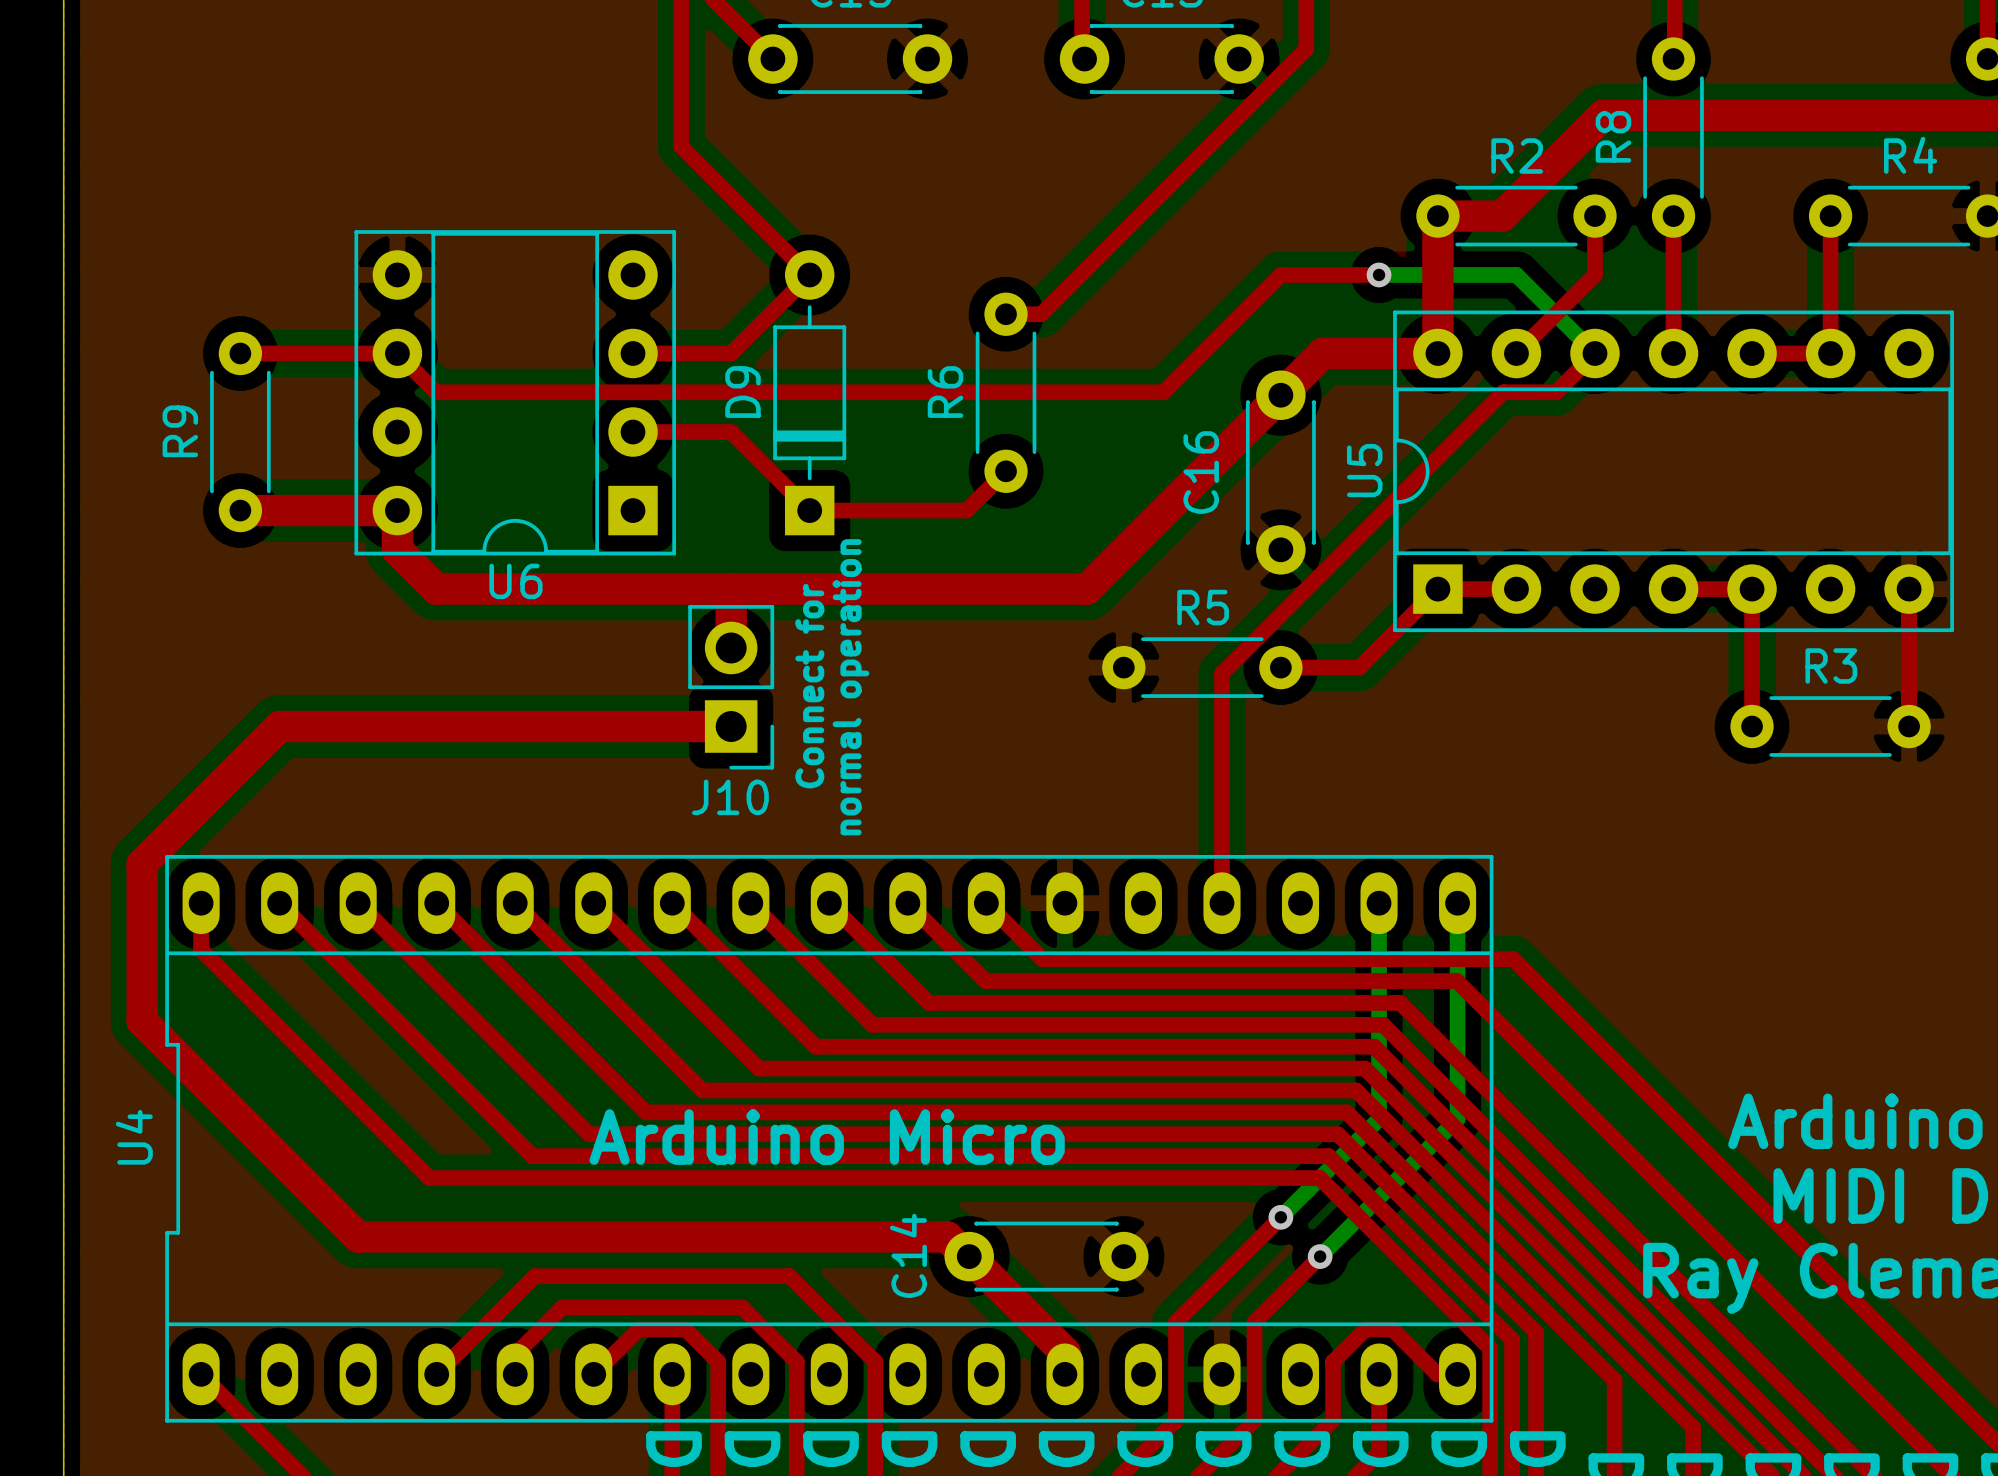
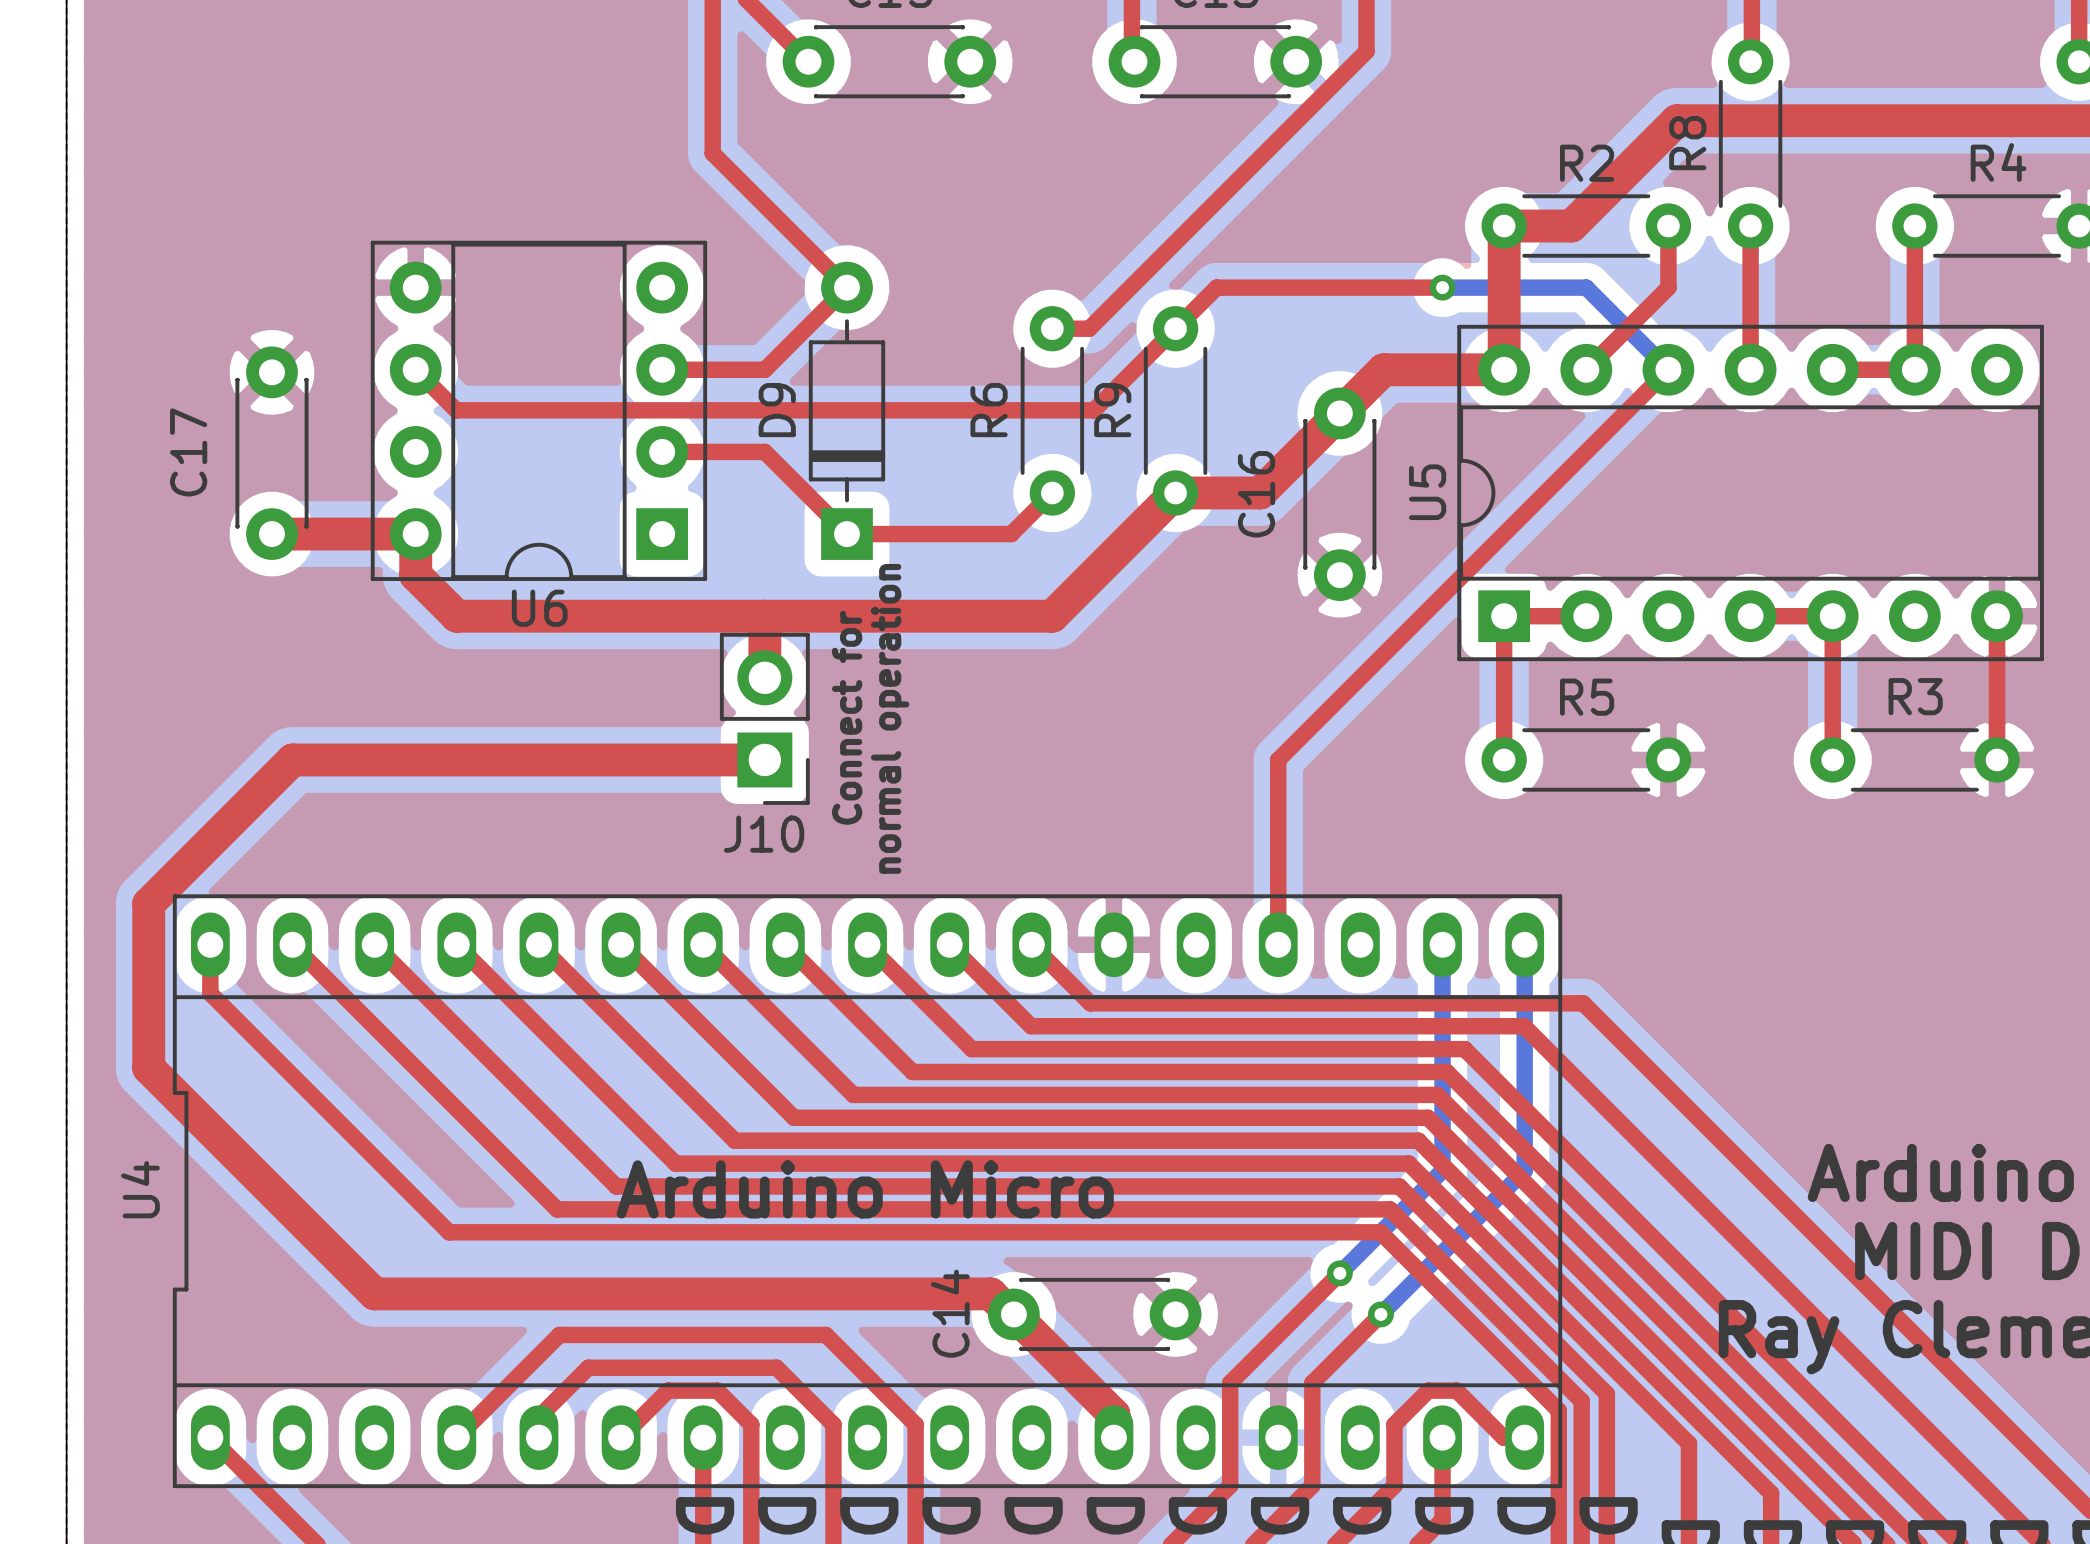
top track: (1280, 274) (1163, 392) (1045, 392) -> (1339, 287) (1216, 287) (1093, 410)
top track: (240, 353) (397, 353) -> none
top track: (1556, 392) (1503, 392) (1221, 673) (1221, 726) -> (1627, 410) (1278, 759)
R9 position: (240, 432) -> (1175, 410)
C17: none -> (271, 453)
top track: (1204, 471) (1087, 589) (1006, 589) -> (1260, 492) (1175, 492) (1052, 616)
top track: (1437, 589) (1359, 667) (1280, 667) -> (1504, 616) (1504, 759)
R5 position: (1202, 667) -> (1586, 759)

